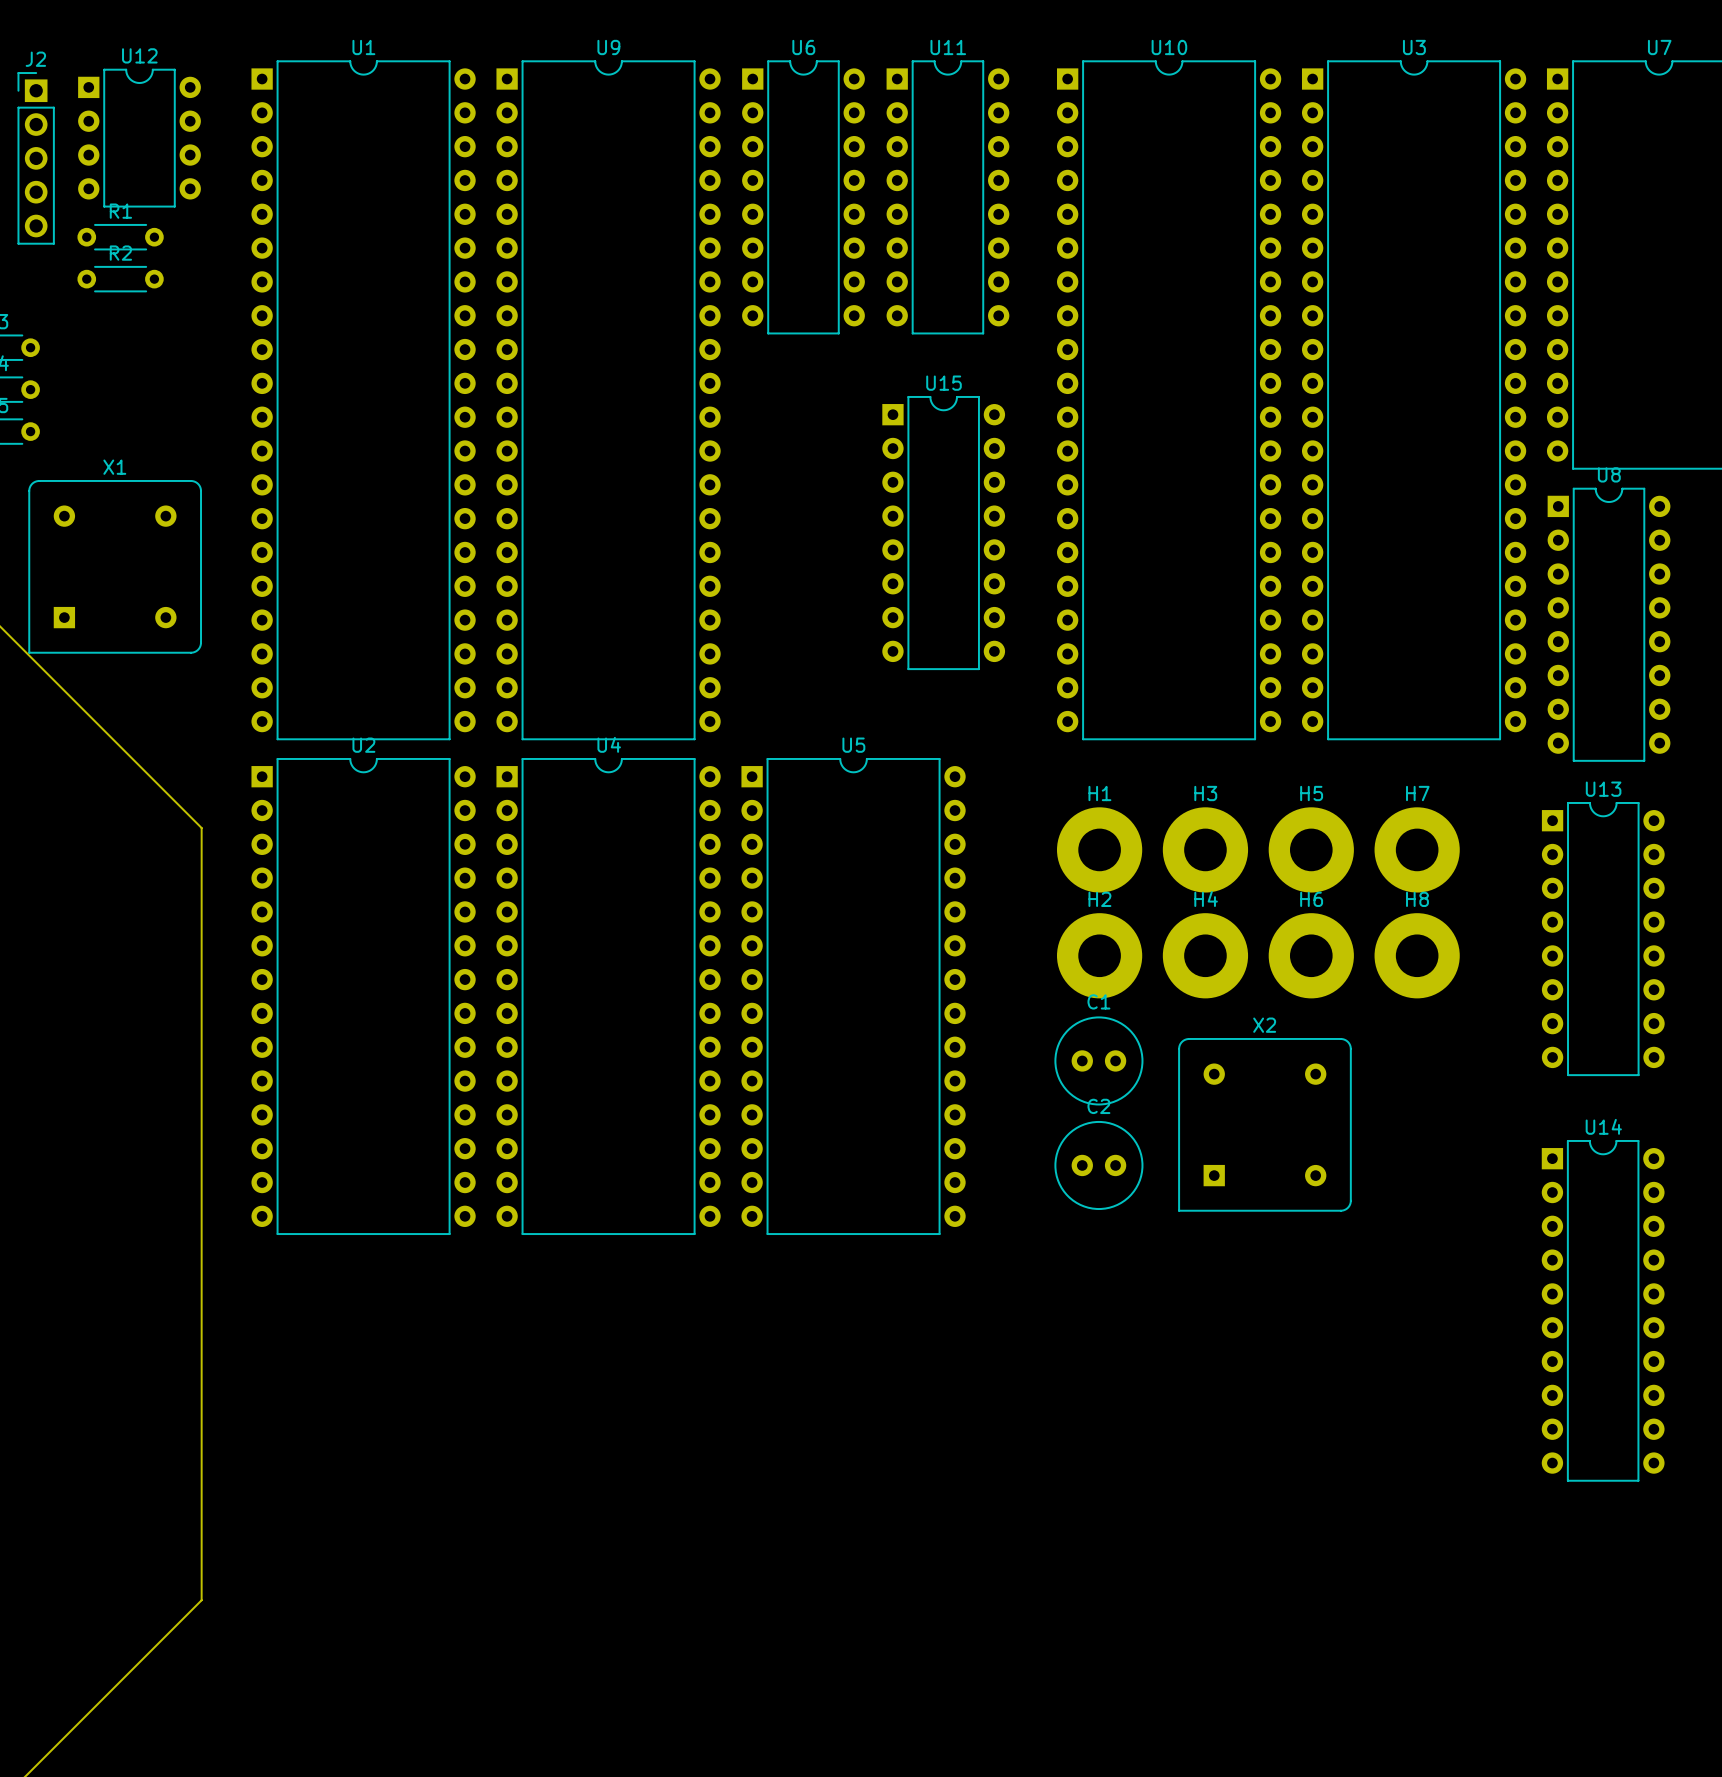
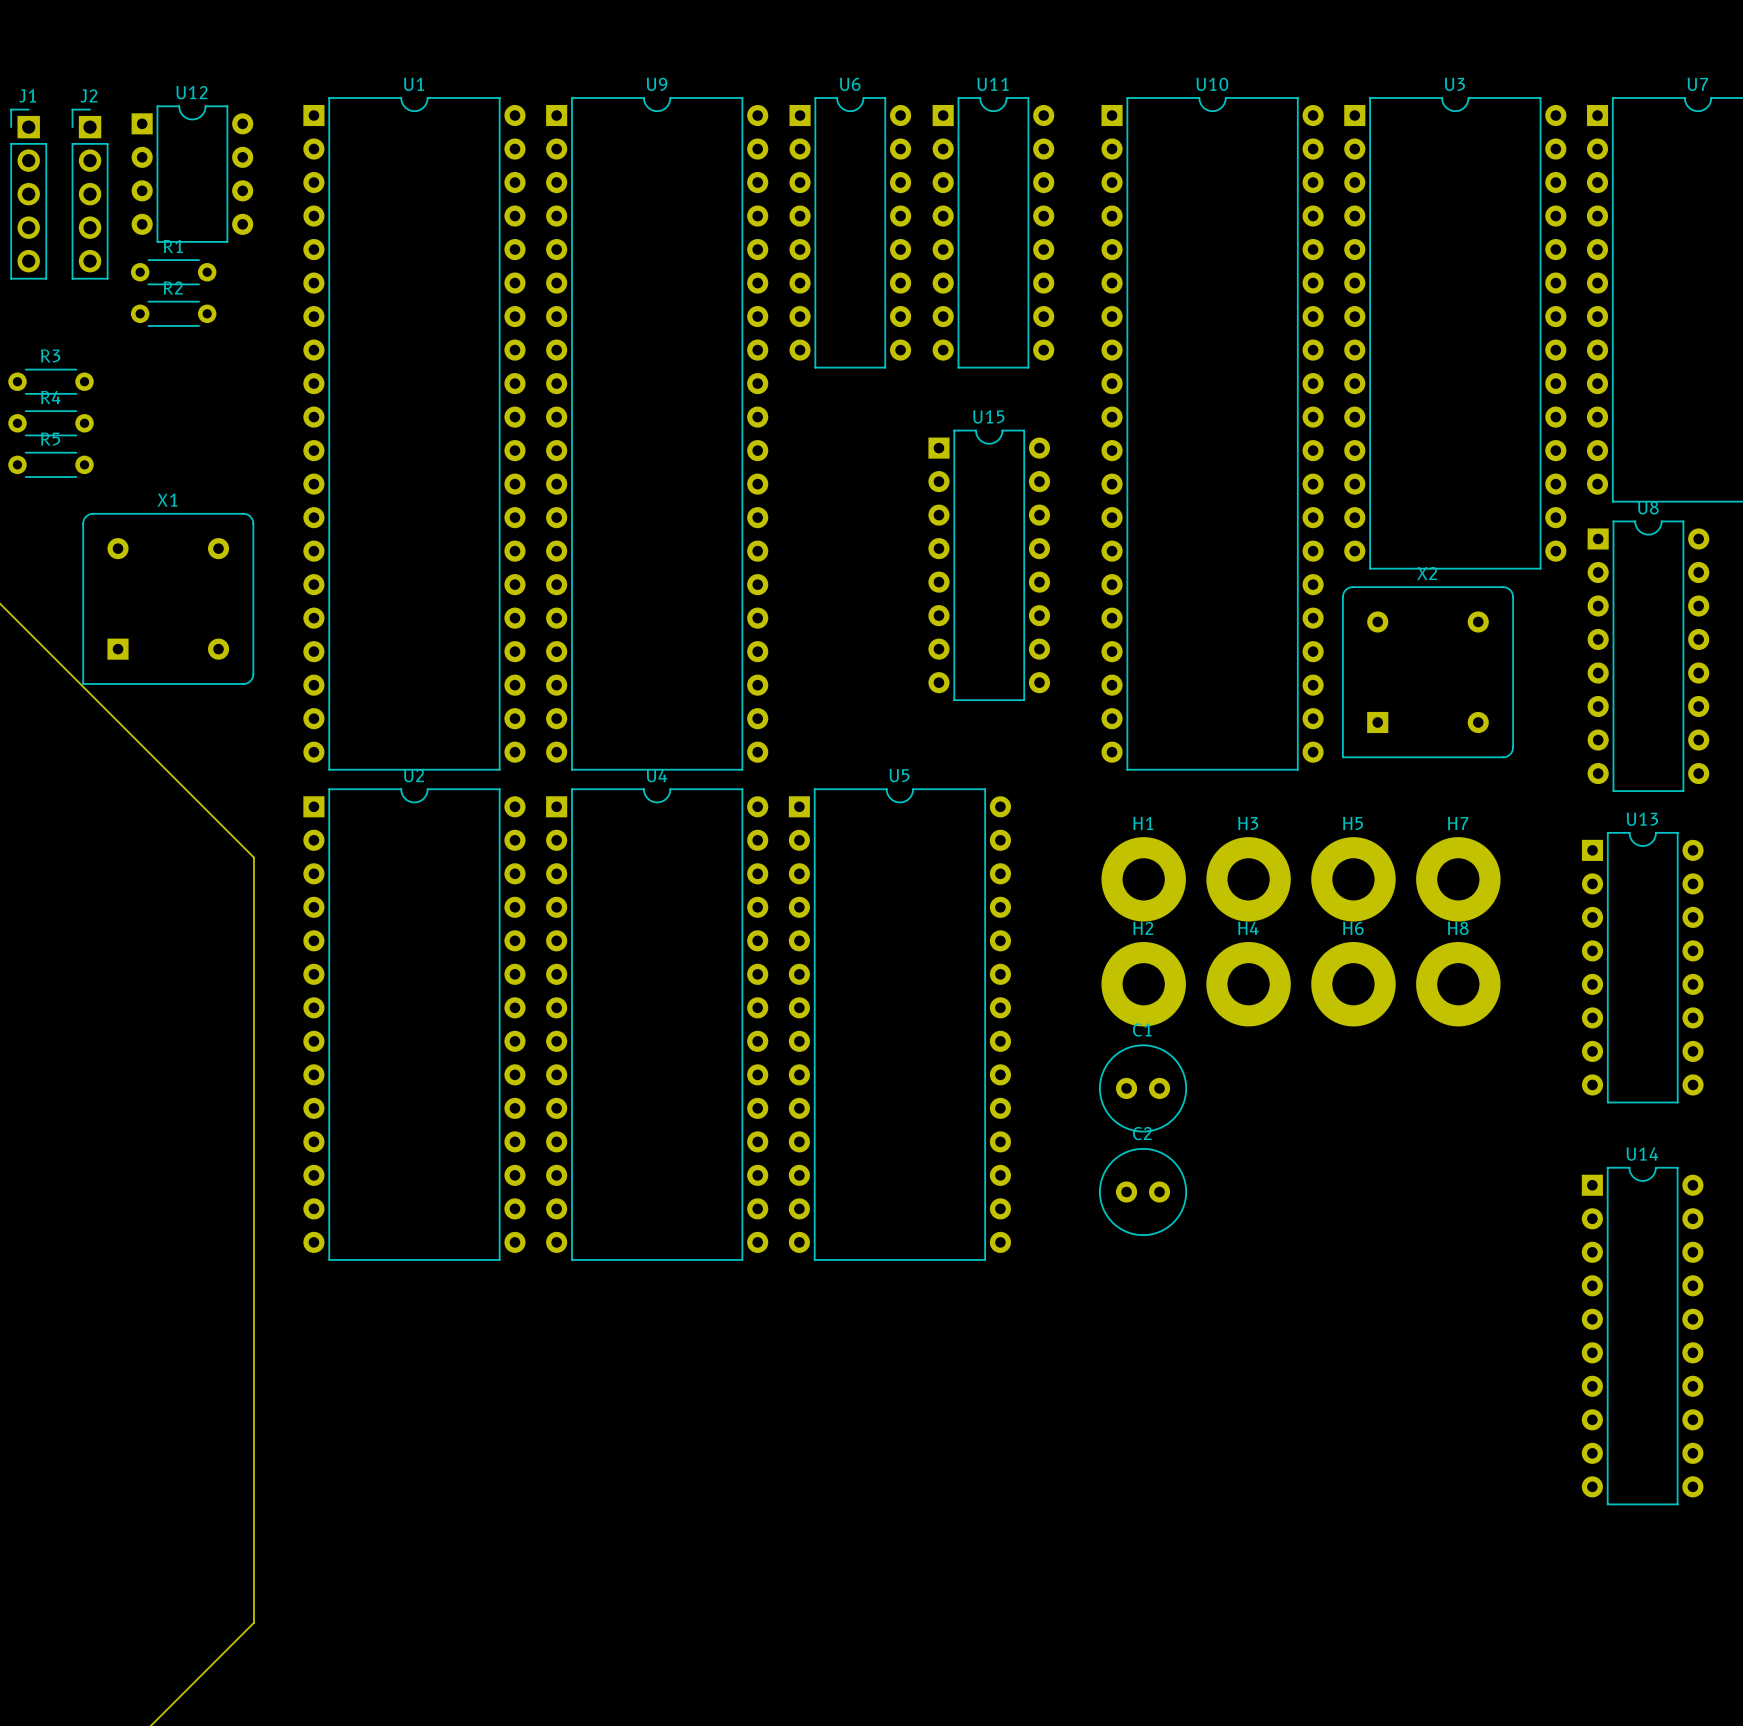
U3 footprint: [1301, 60, 1527, 741] -> [1344, 97, 1567, 570]
X2 position: (1264, 1124) -> (1427, 672)

